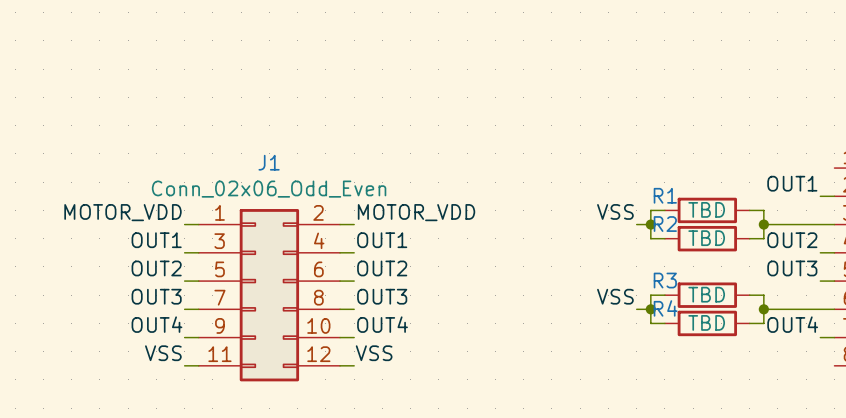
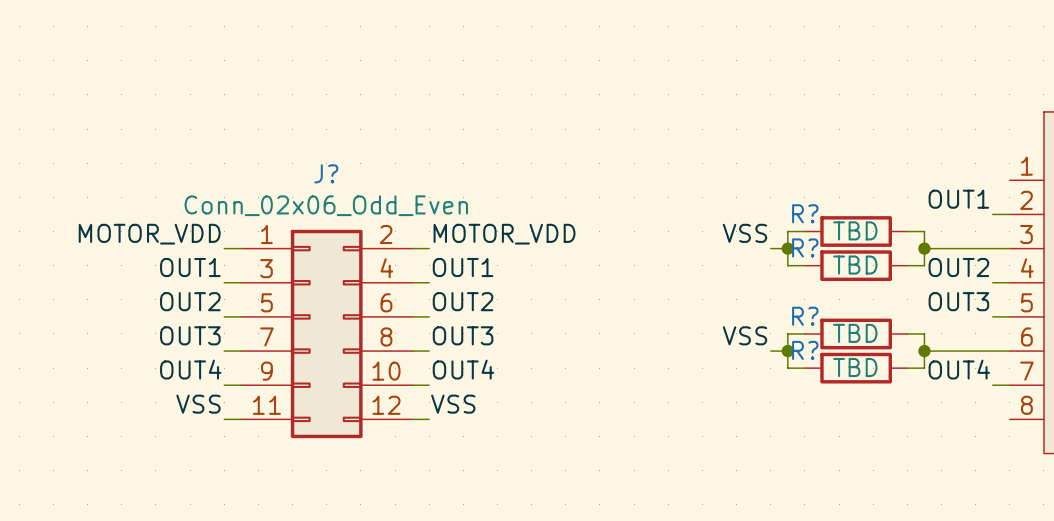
J1 name: J1 (269, 162) -> J? (326, 173)
R1 name: R1 (665, 195) -> R? (805, 213)
R2 name: R2 (665, 224) -> R? (805, 247)
R3 name: R3 (665, 280) -> R? (805, 316)
R4 name: R4 (665, 308) -> R? (805, 350)

